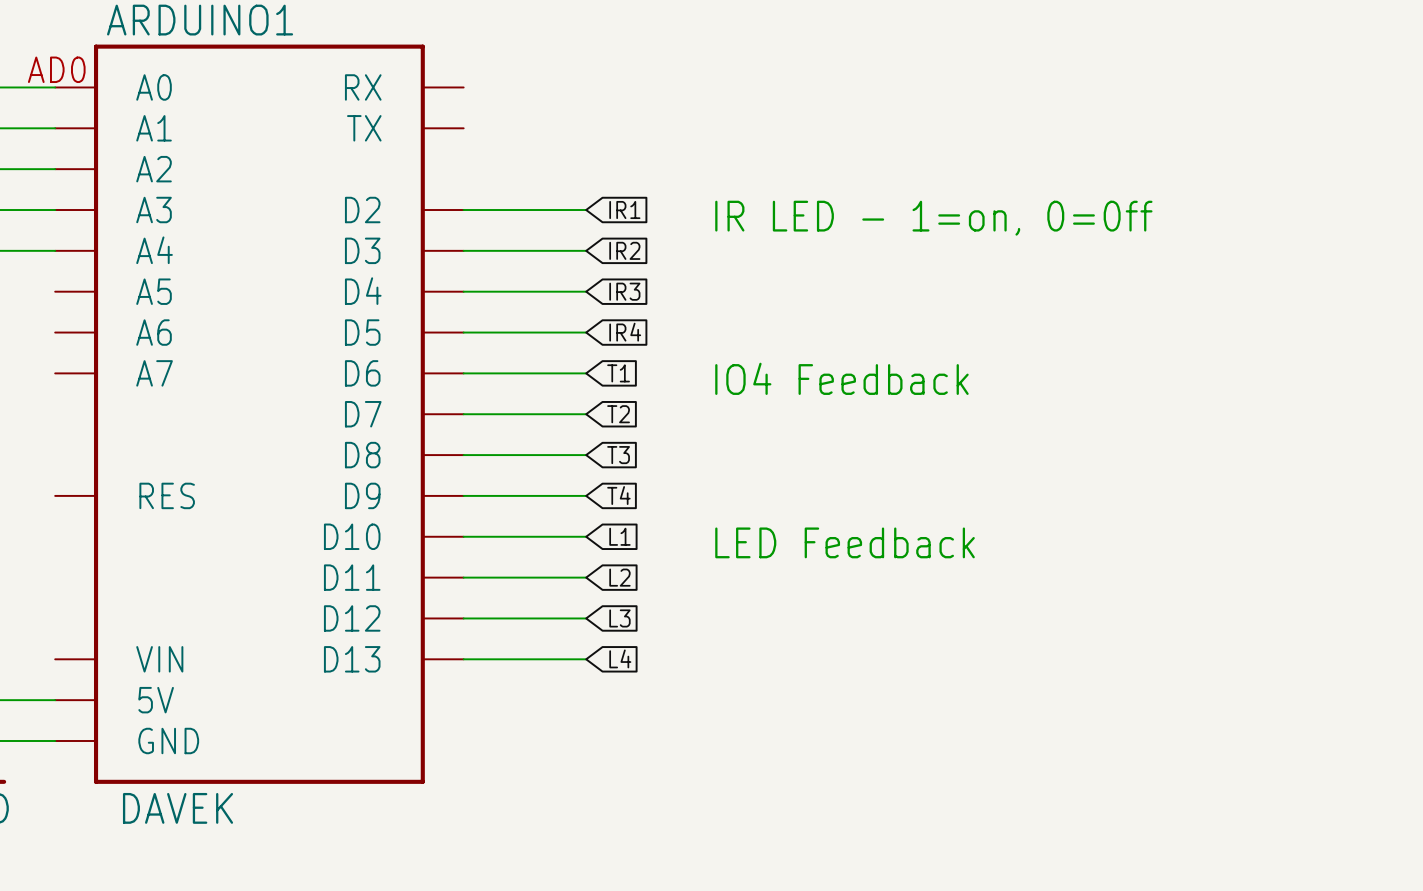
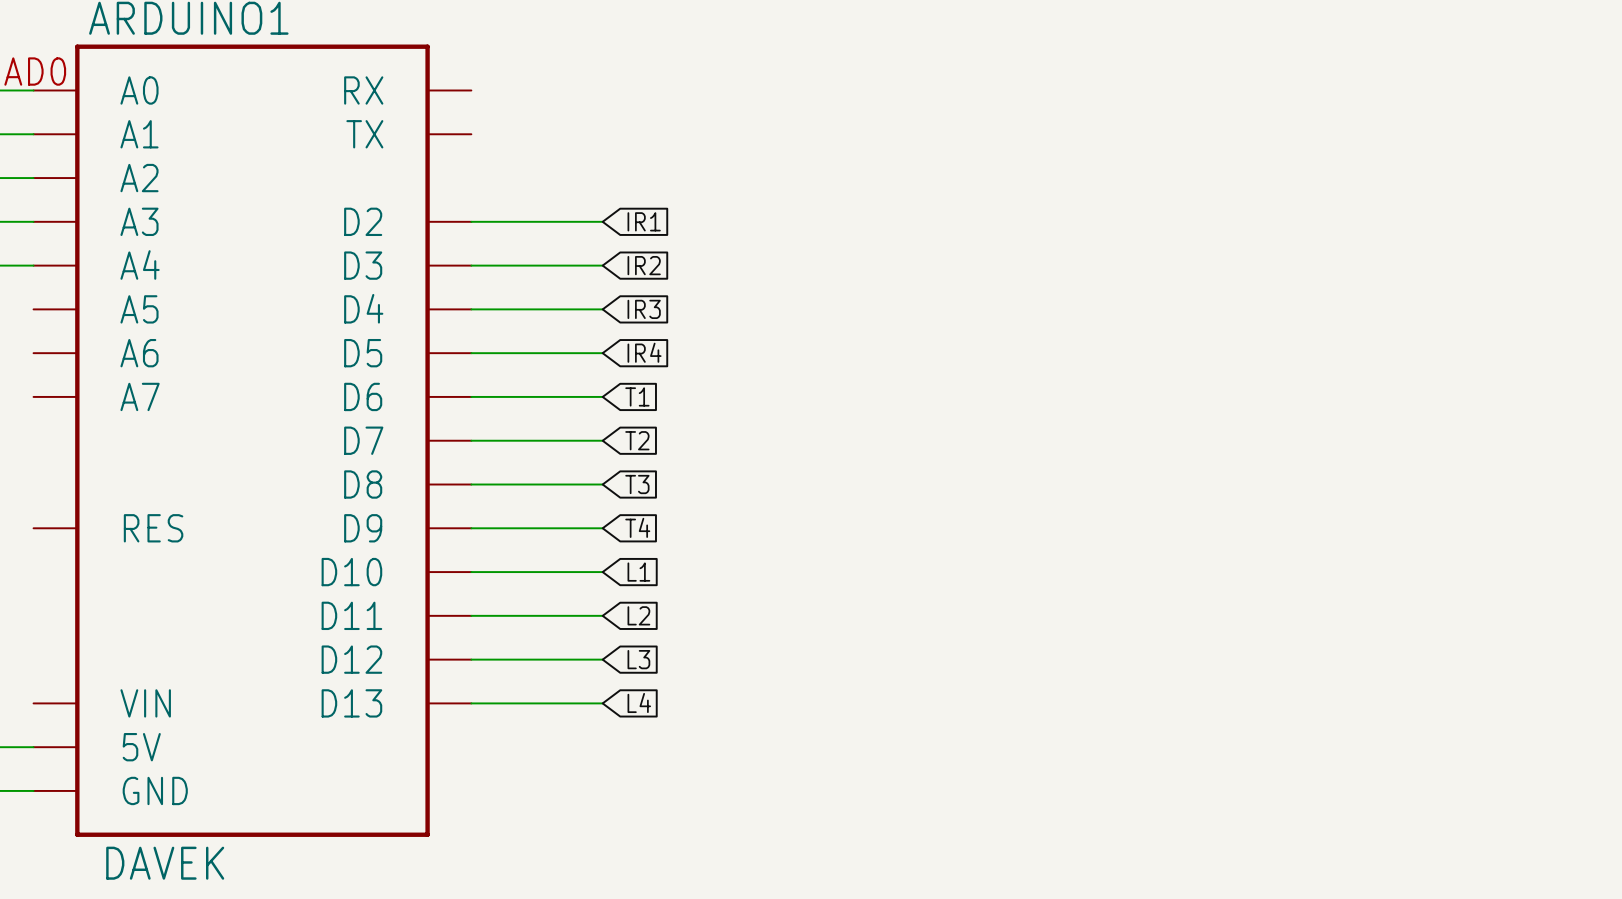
text: IR LED - 1=on, 0=0ff (933, 218) -> none
text: IO4 Feedback (841, 378) -> none
text: LED Feedback (845, 542) -> none

